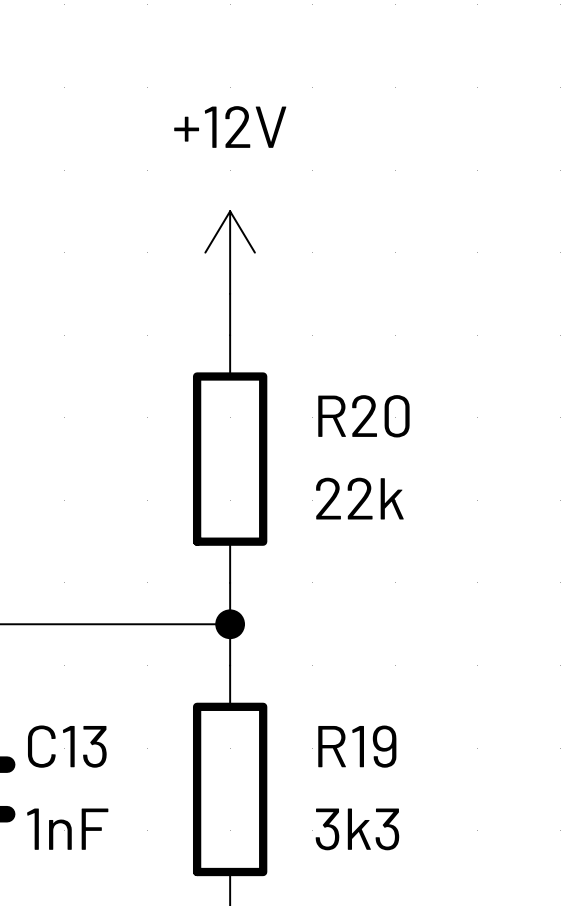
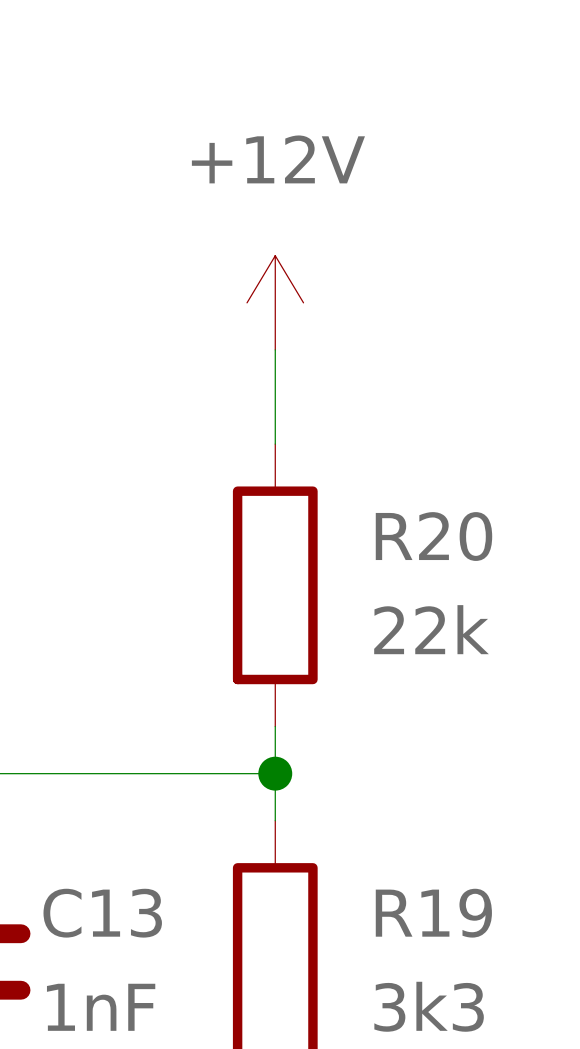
power symbol position: +12V (230, 252) -> +12V (275, 302)

